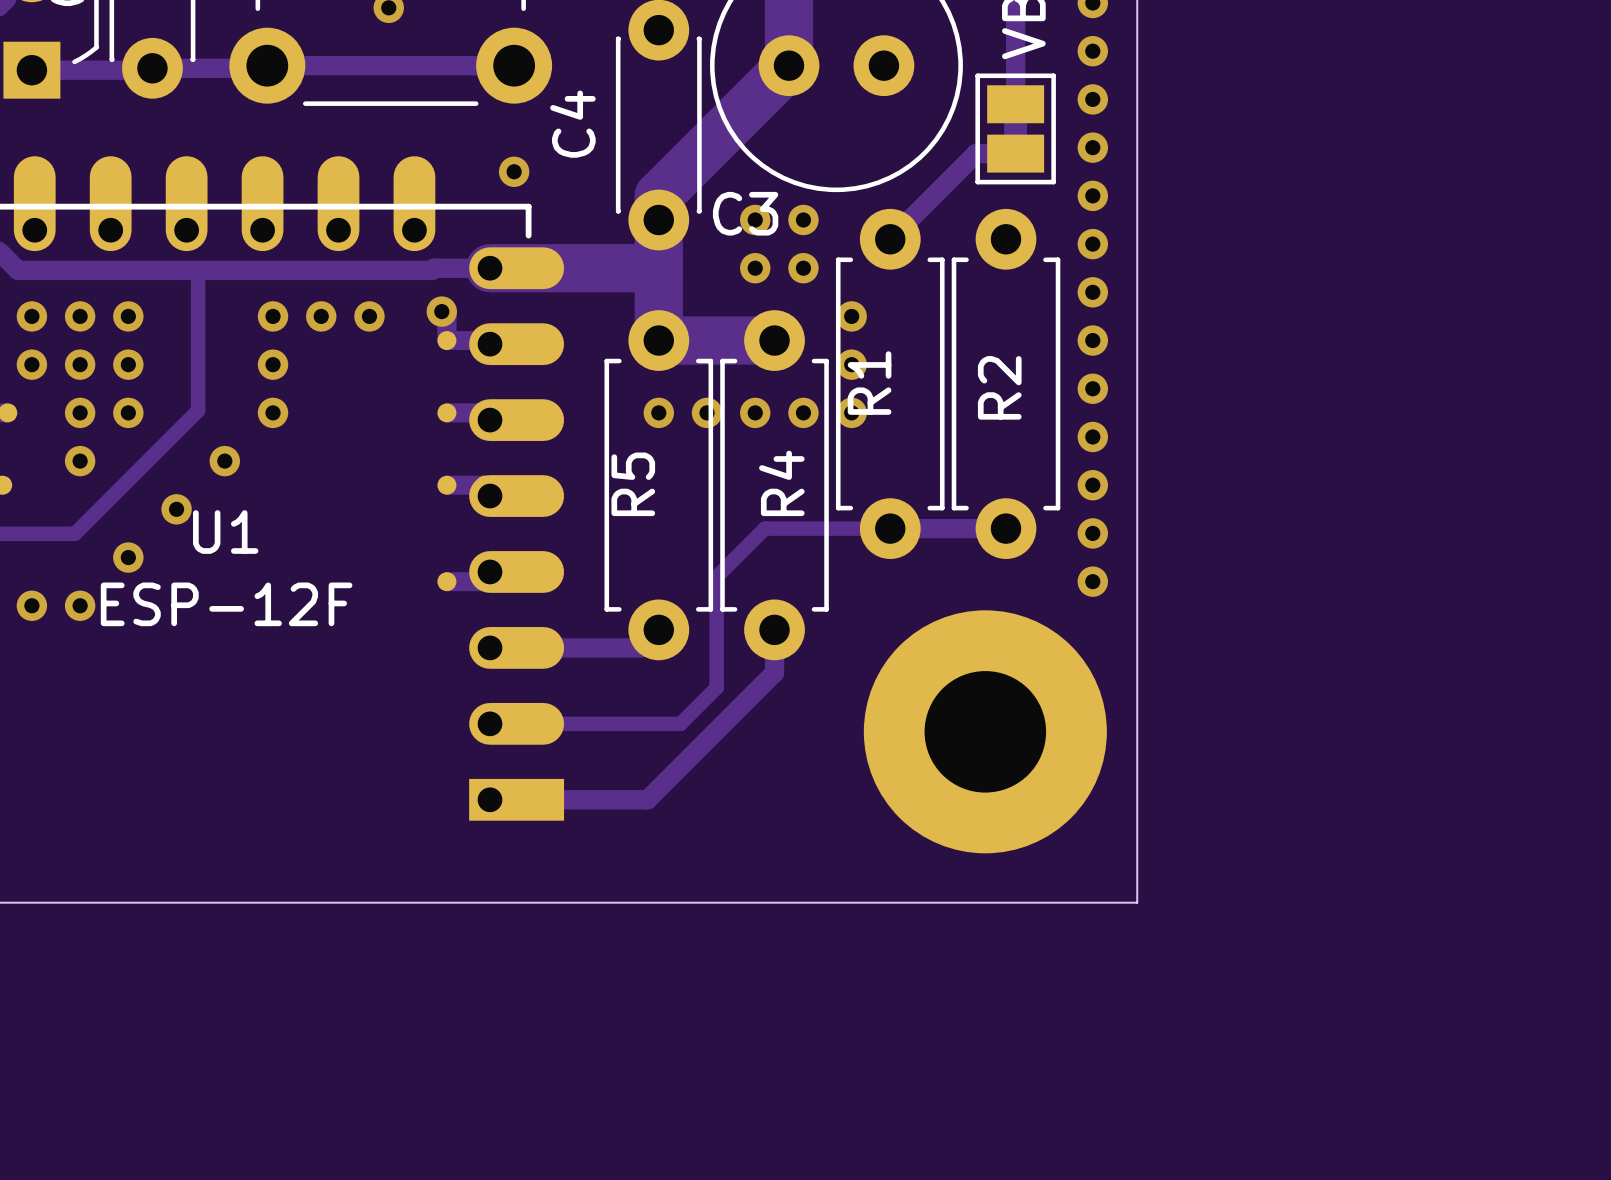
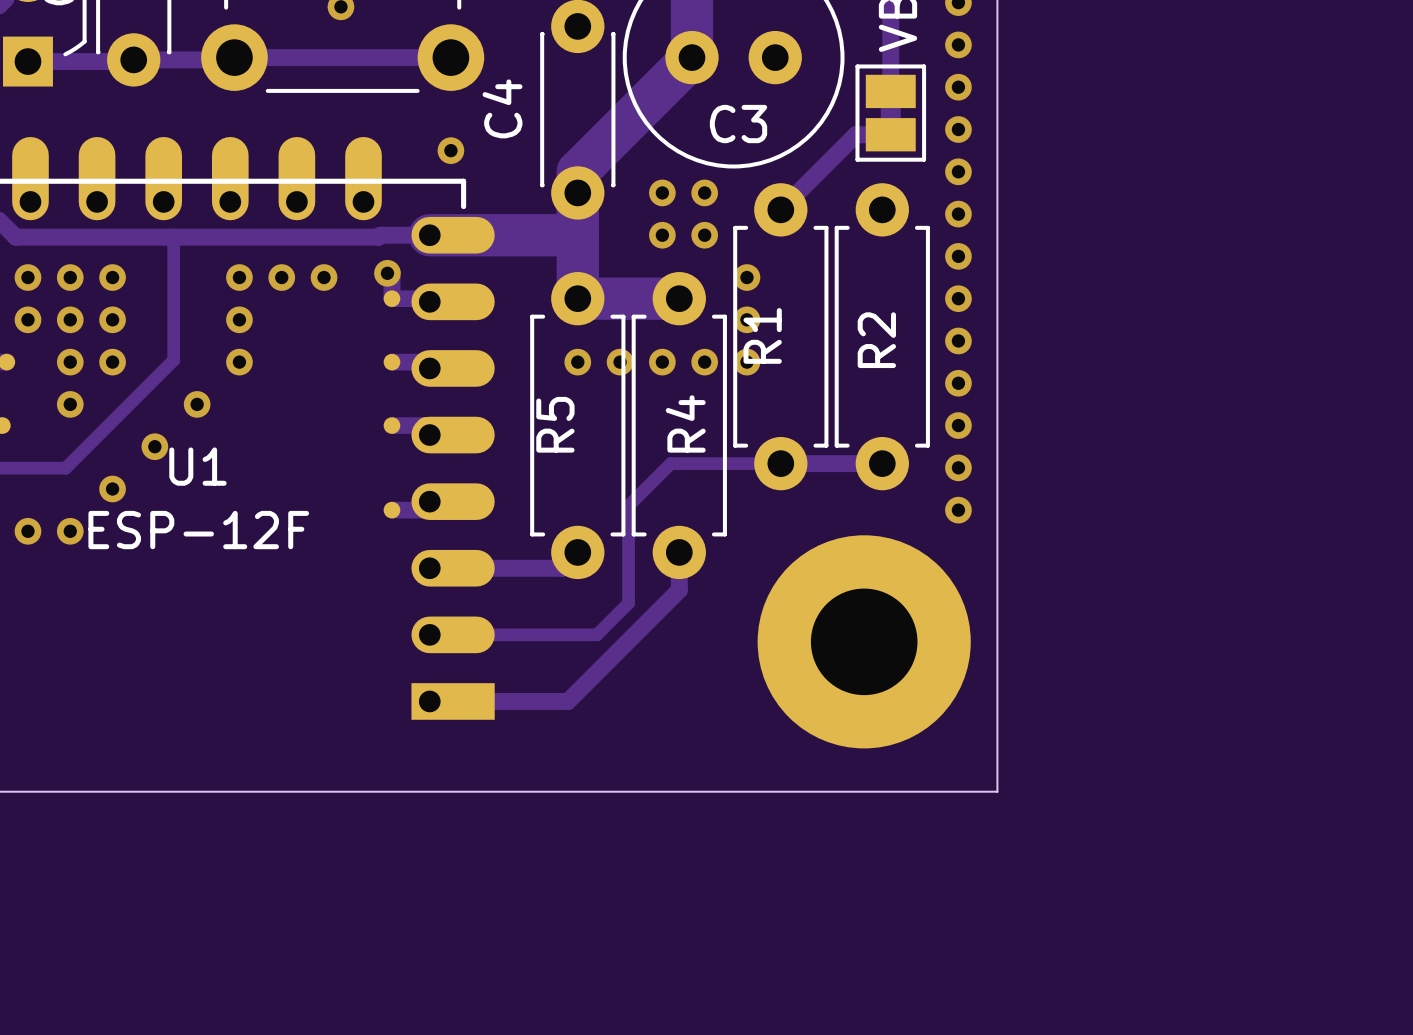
C3 name position: C3 (745, 213) -> C3 (738, 124)

